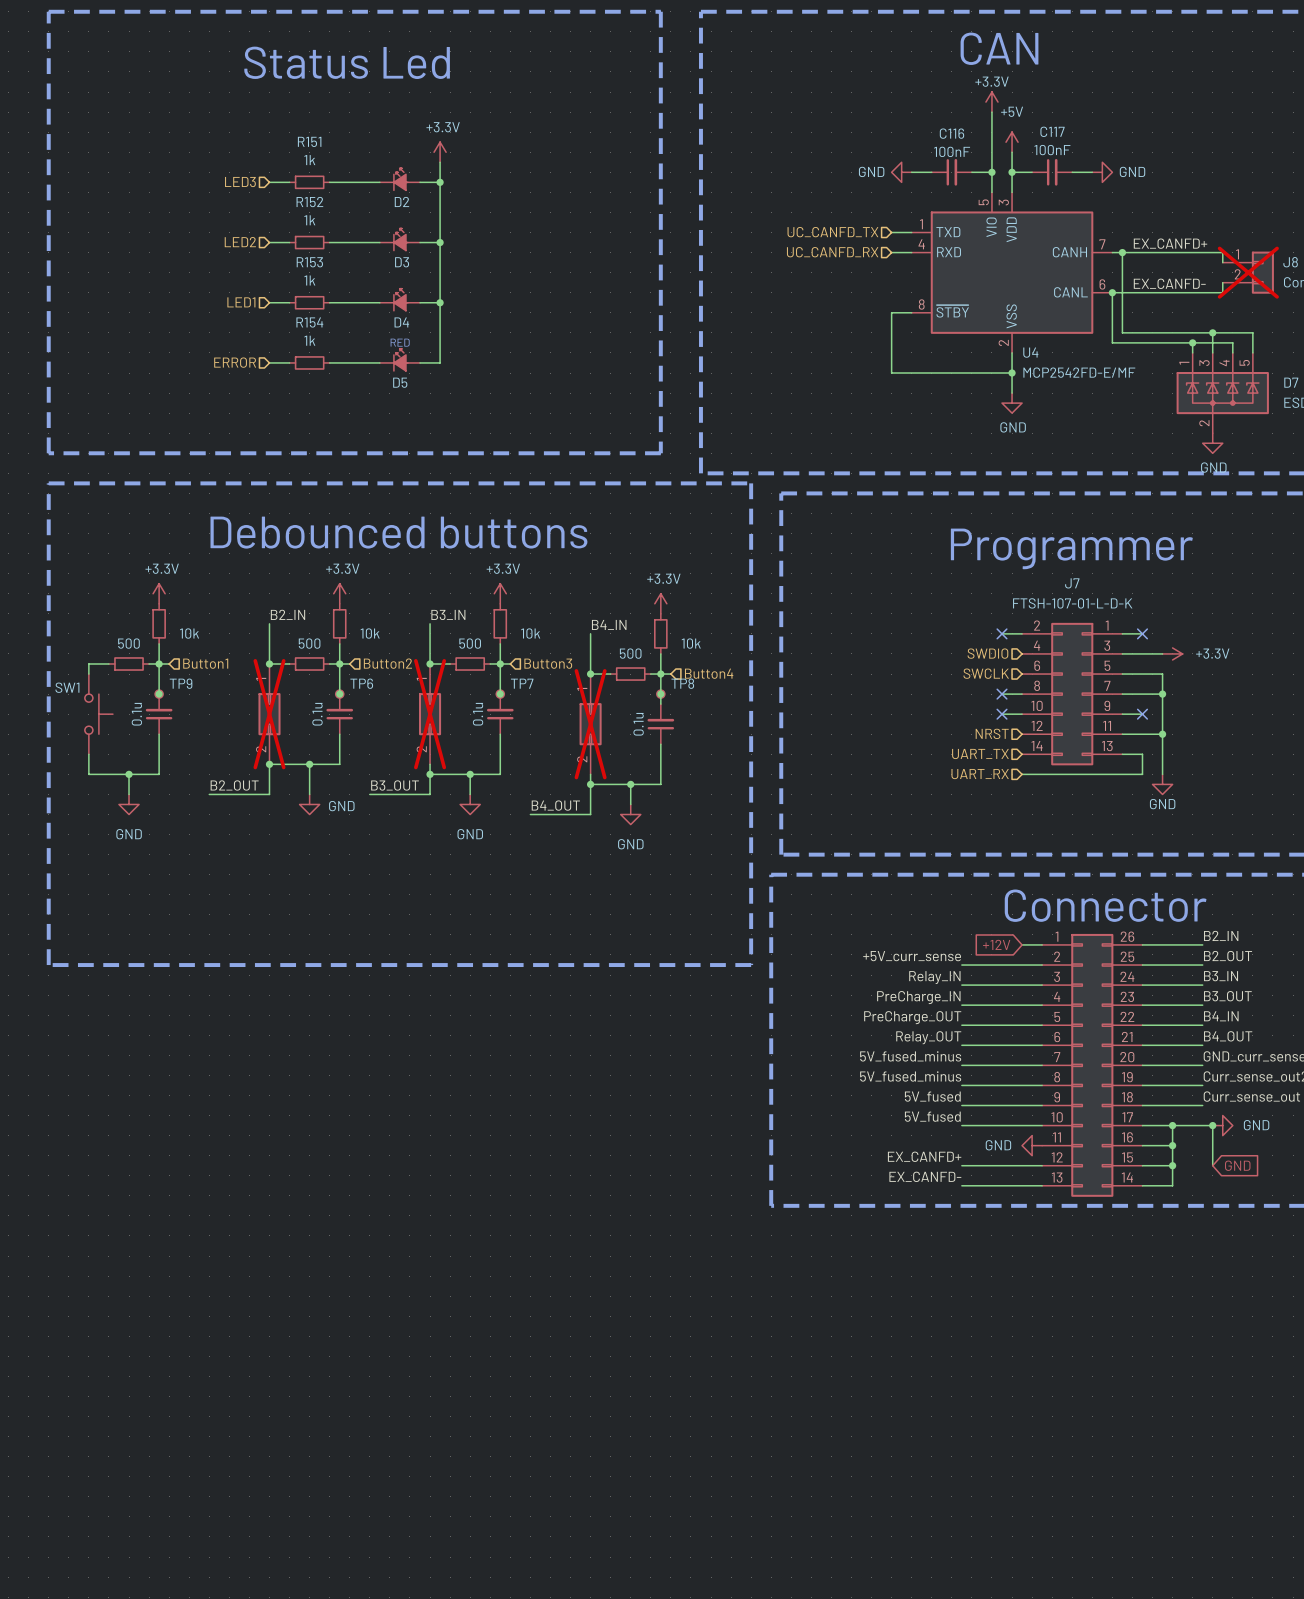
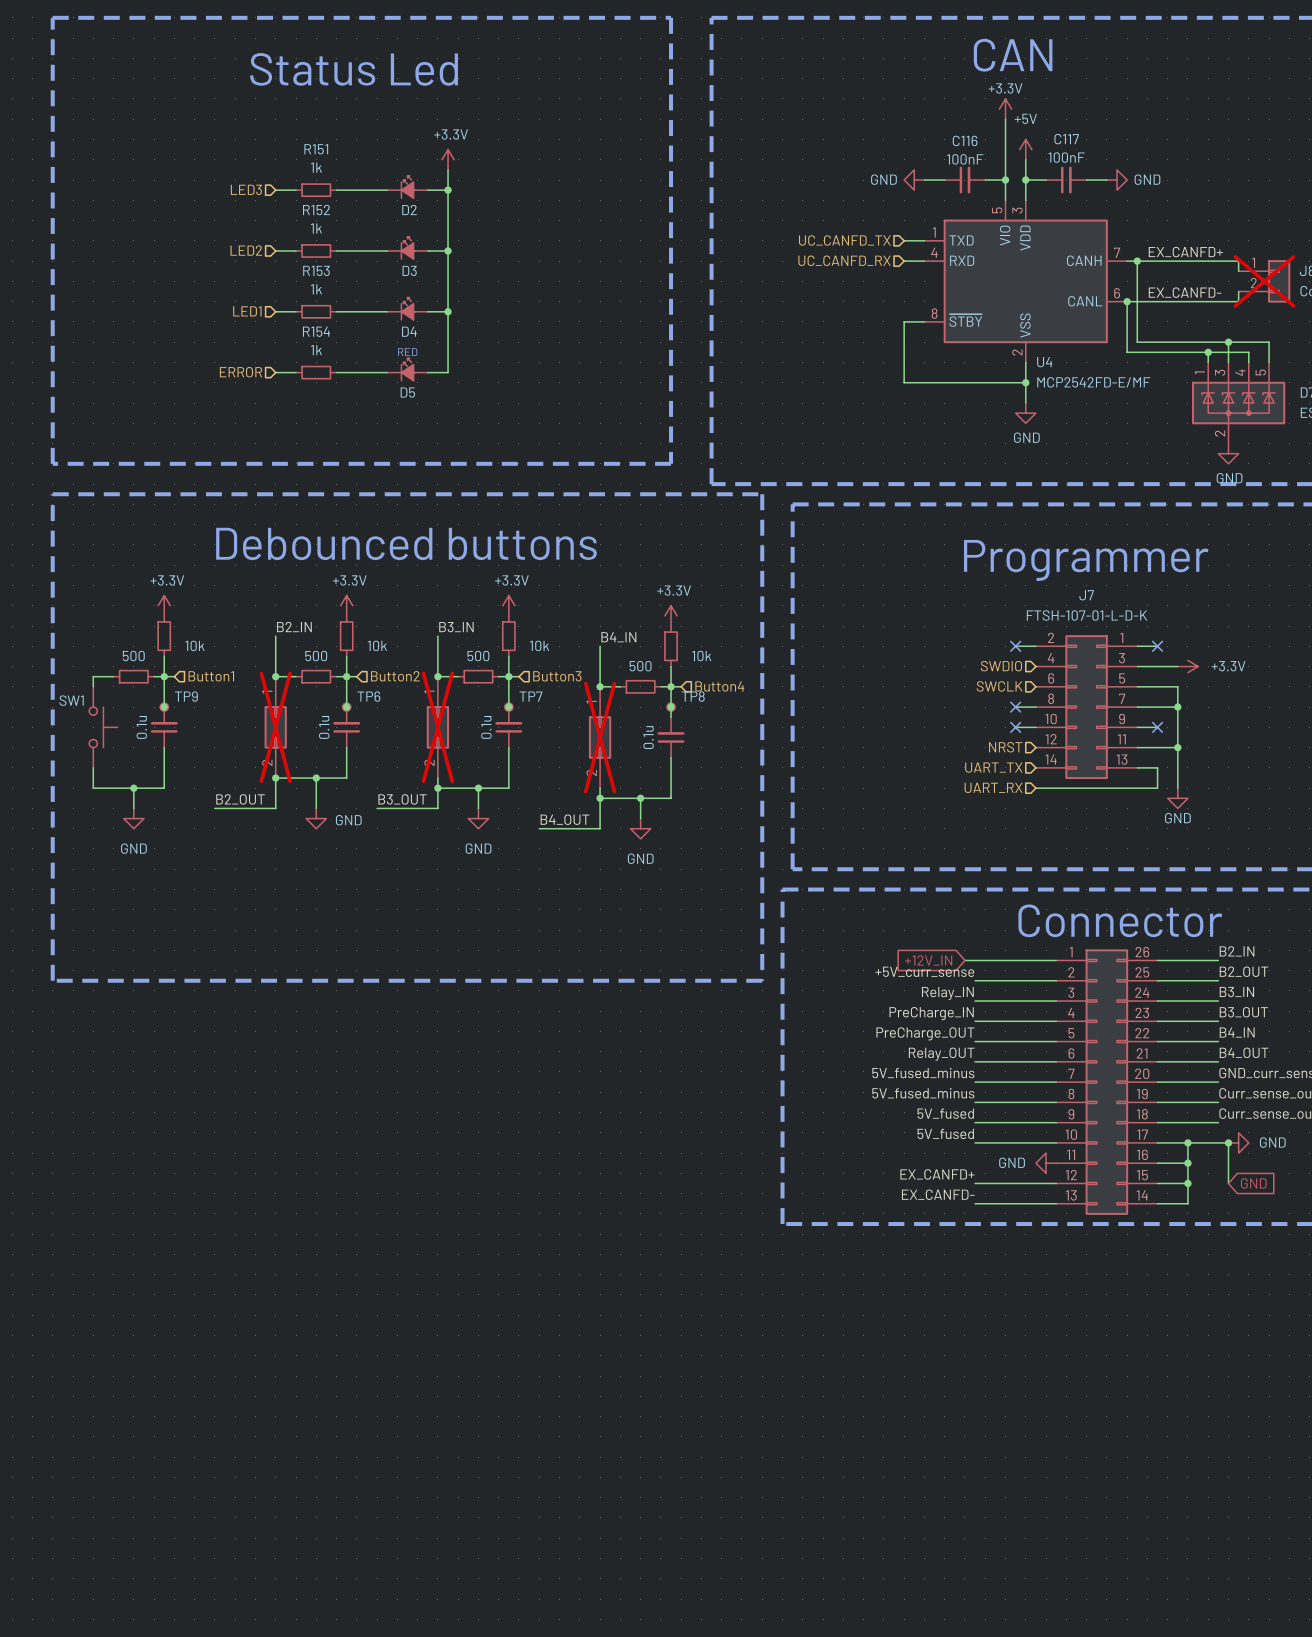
global label: none -> +12V_IN (928, 960)
wire: none -> (964, 960) (1035, 960)
global label: +12V (996, 944) -> none

